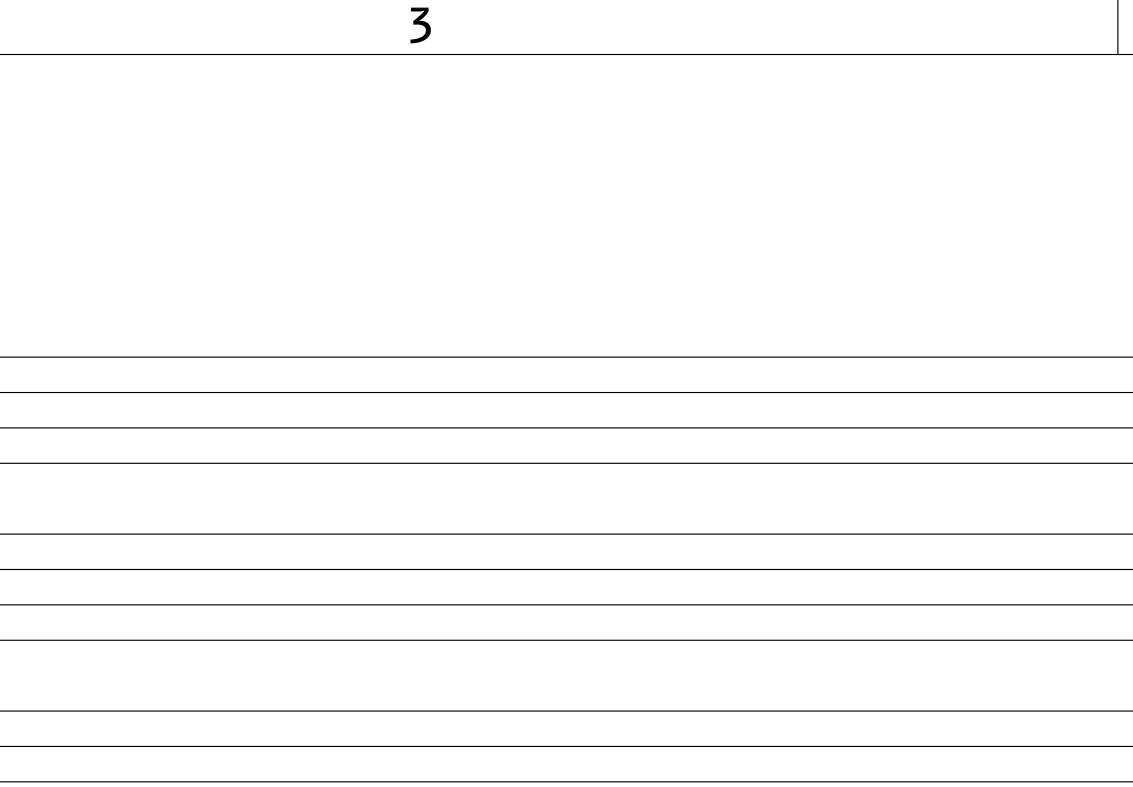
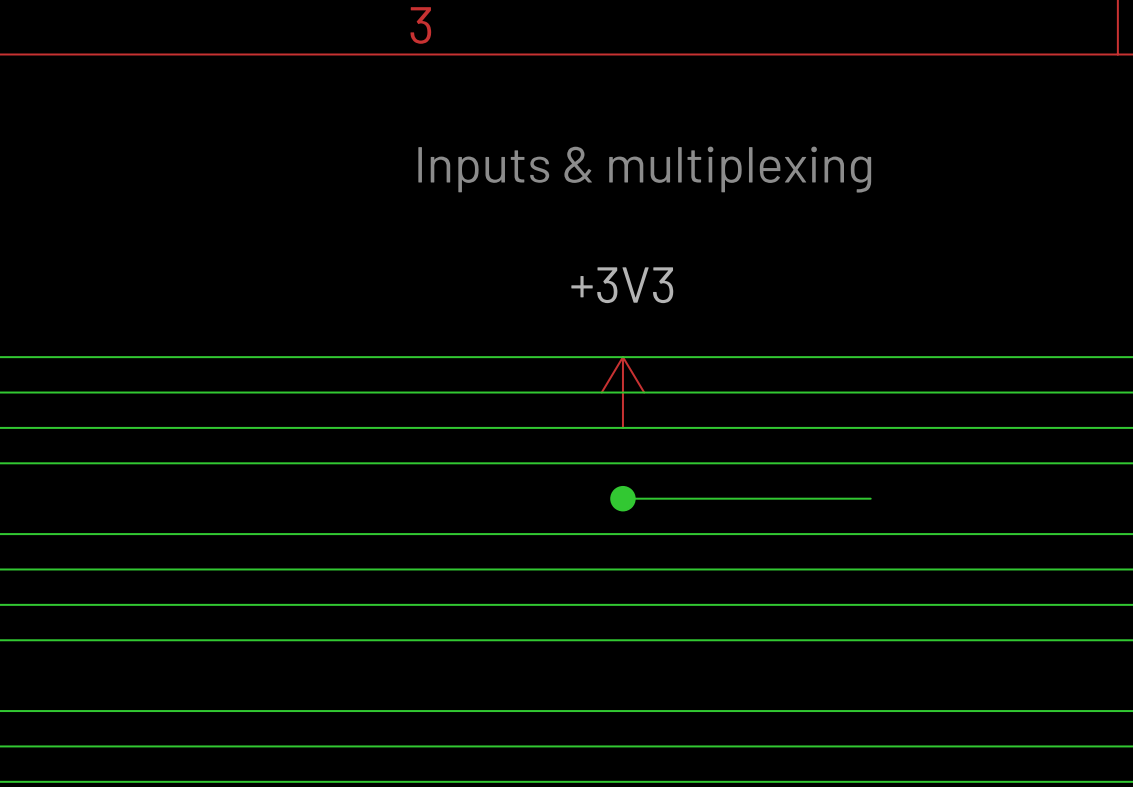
text: none -> Inputs & multiplexing (644, 169)
power symbol: none -> +3V3 (622, 392)
wire: none -> (622, 498) (870, 498)
junction: none -> (622, 498)

